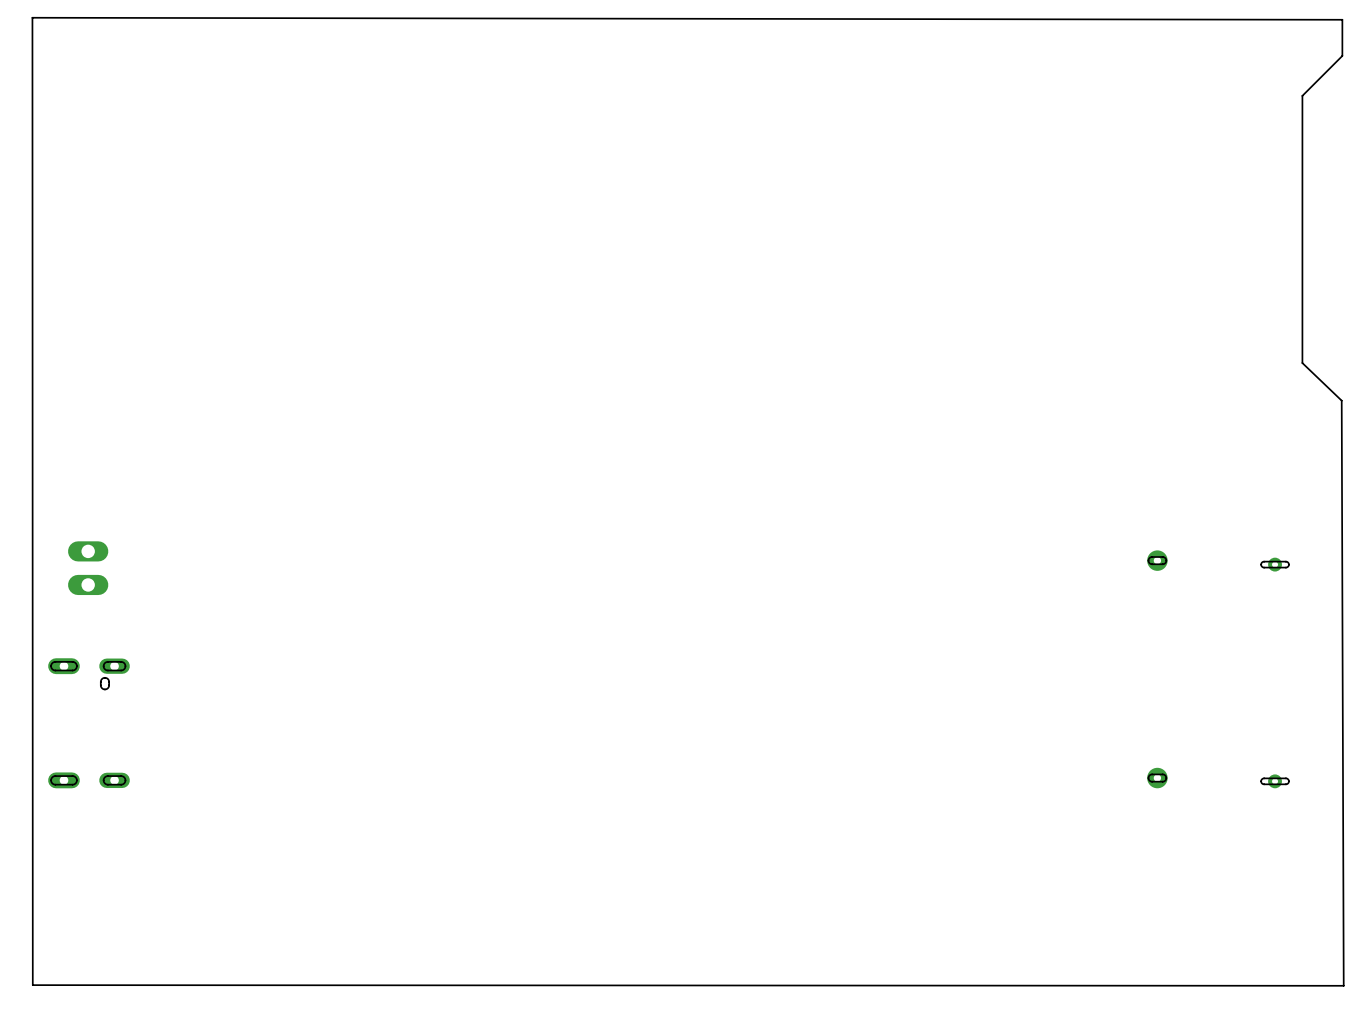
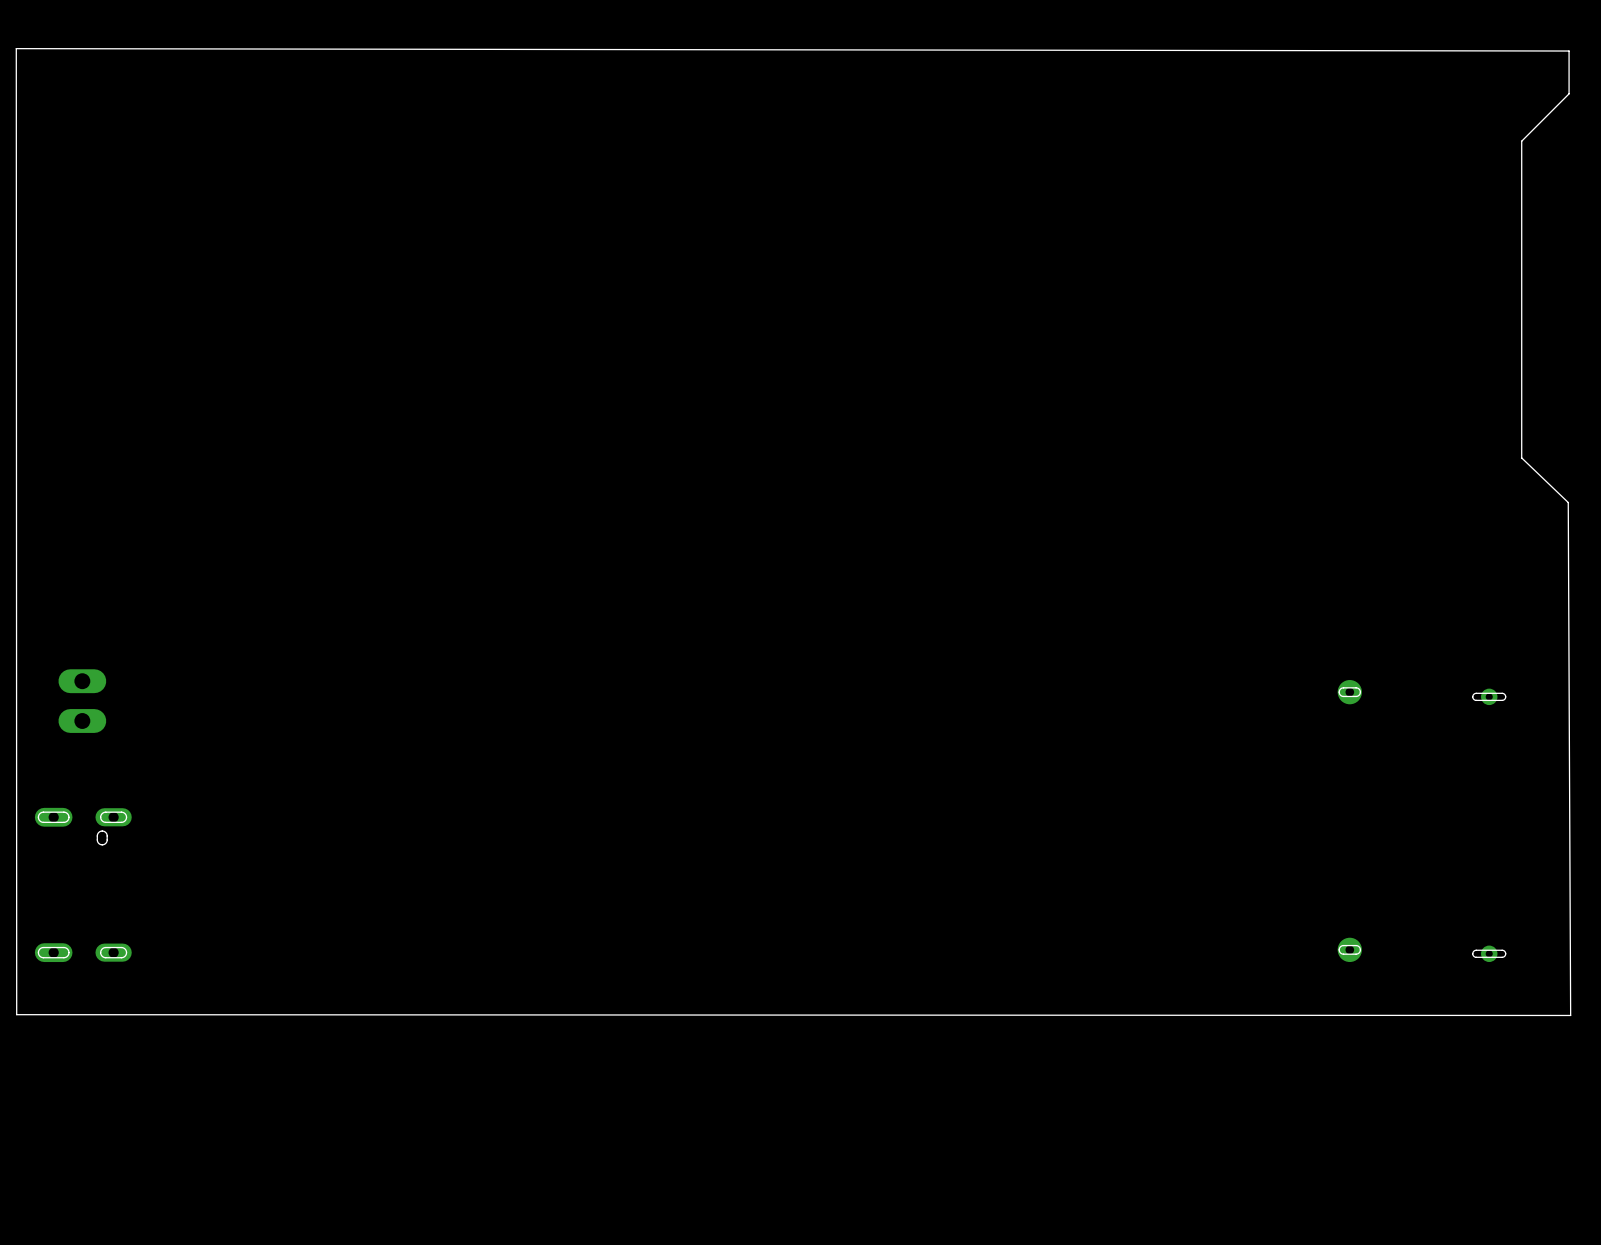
board edge: (32, 17) (32, 985) (1343, 985) (1341, 400) -> (16, 48) (16, 1014) (1570, 1015) (1568, 502)

